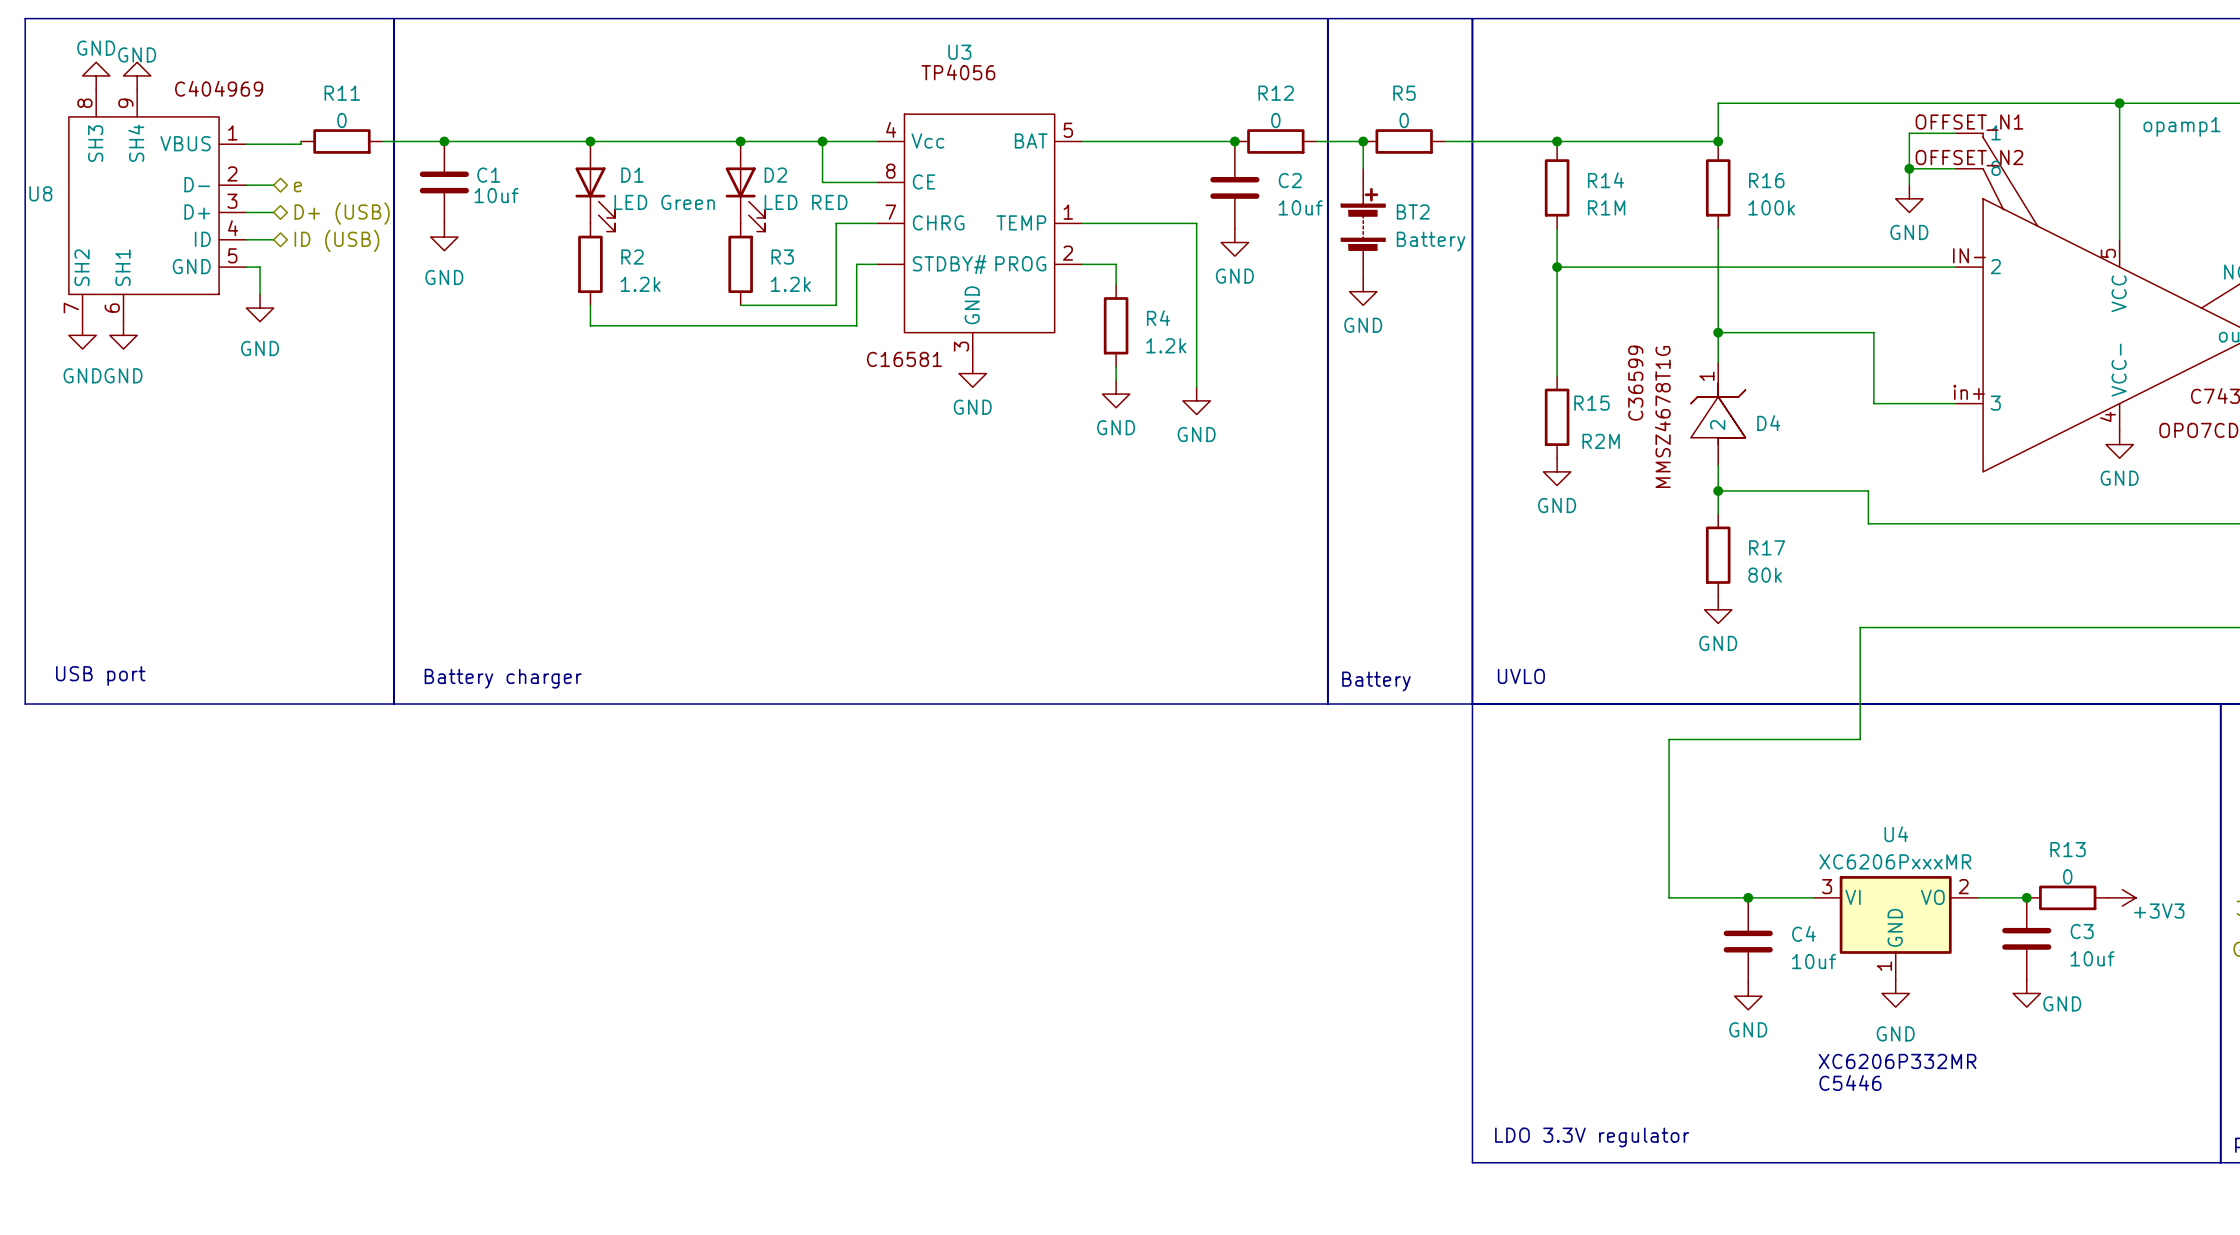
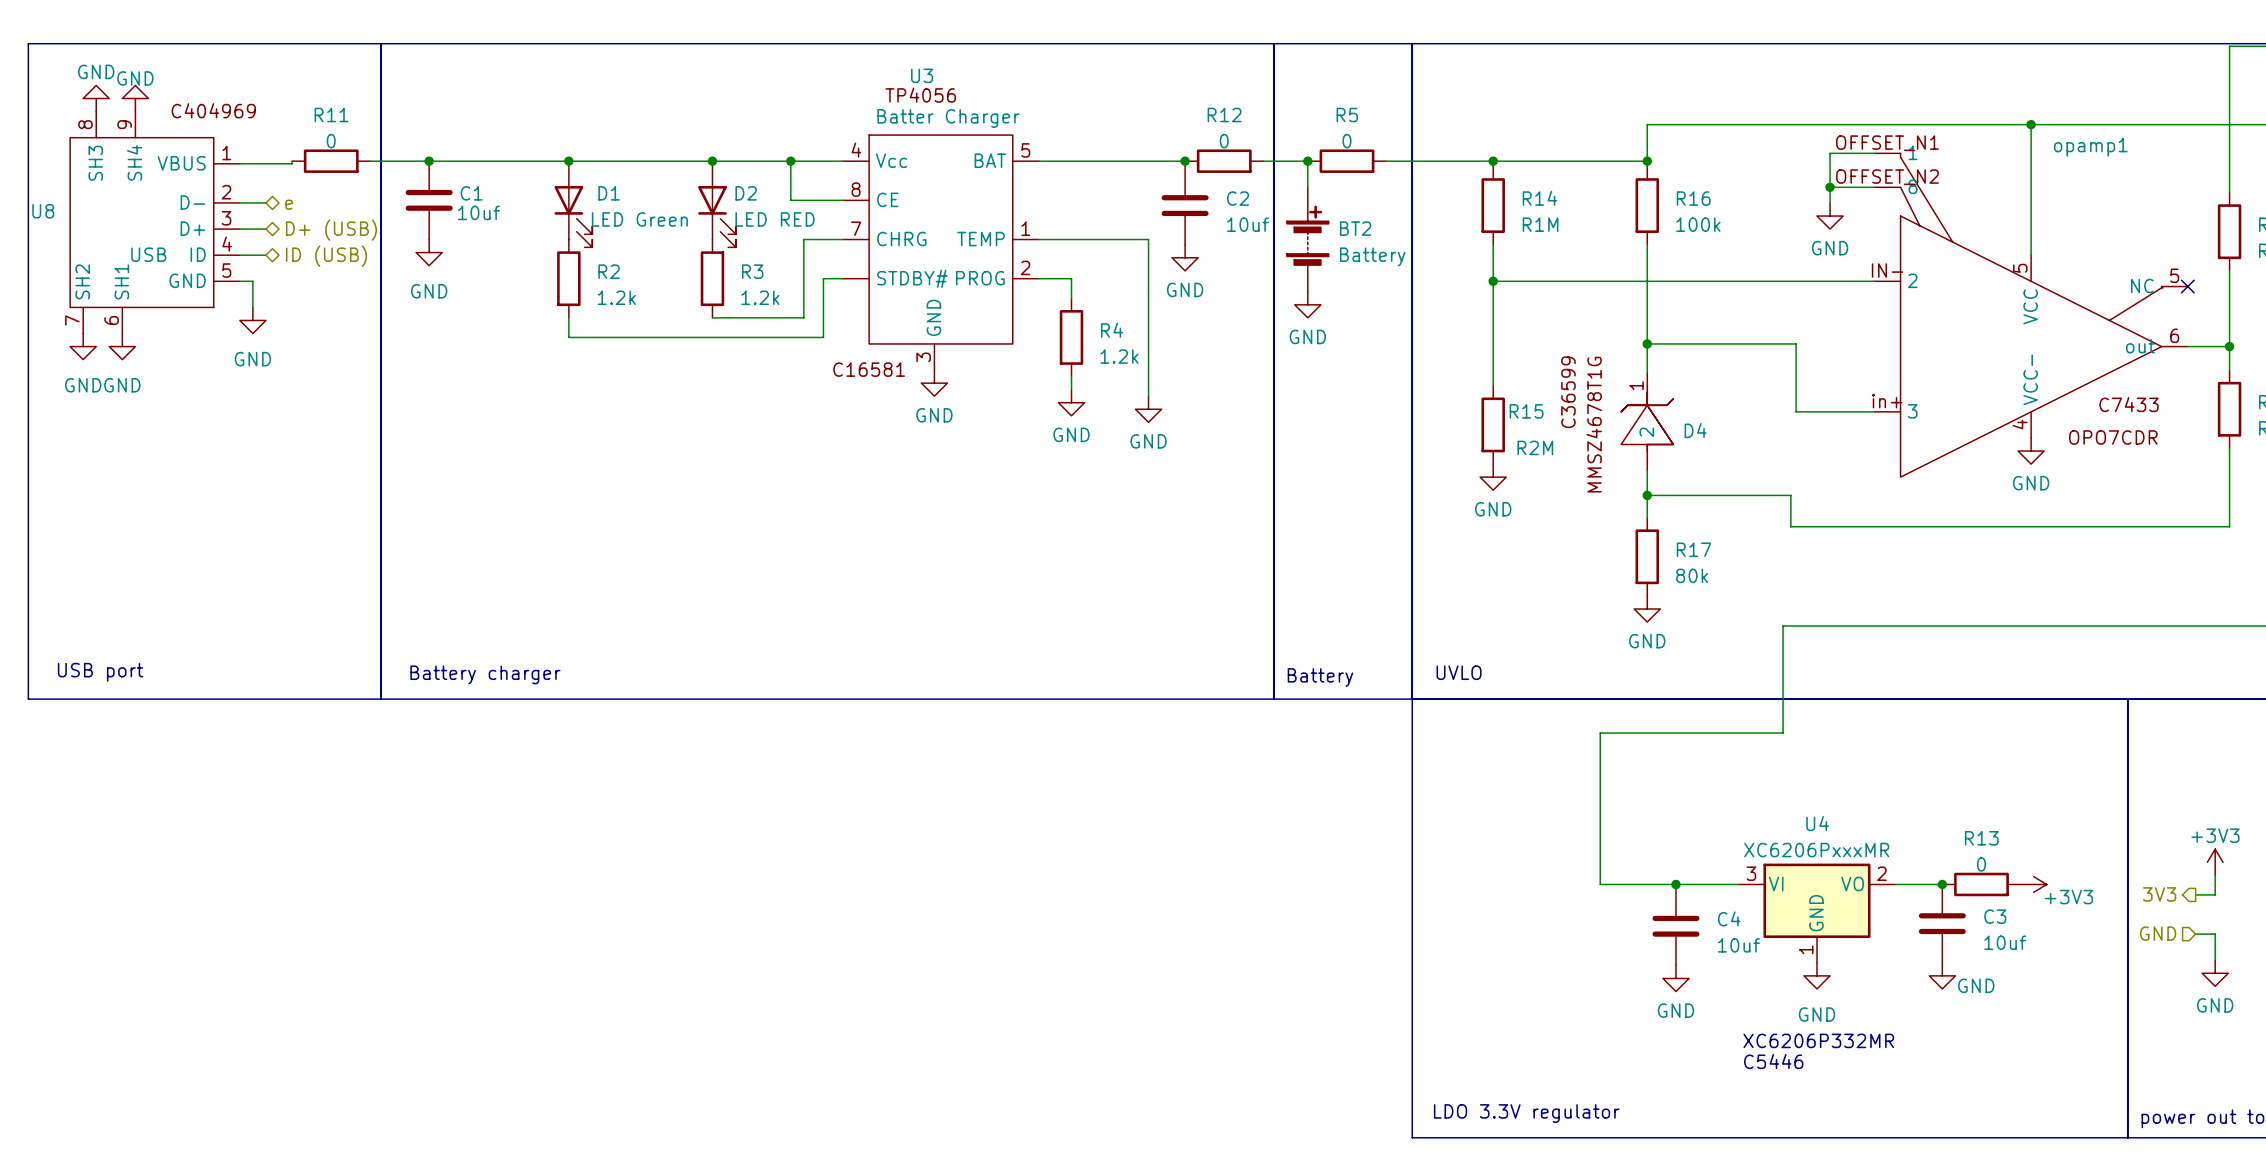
U3 value: none -> Batter Charger (948, 118)
U8 value: none -> USB (148, 254)

